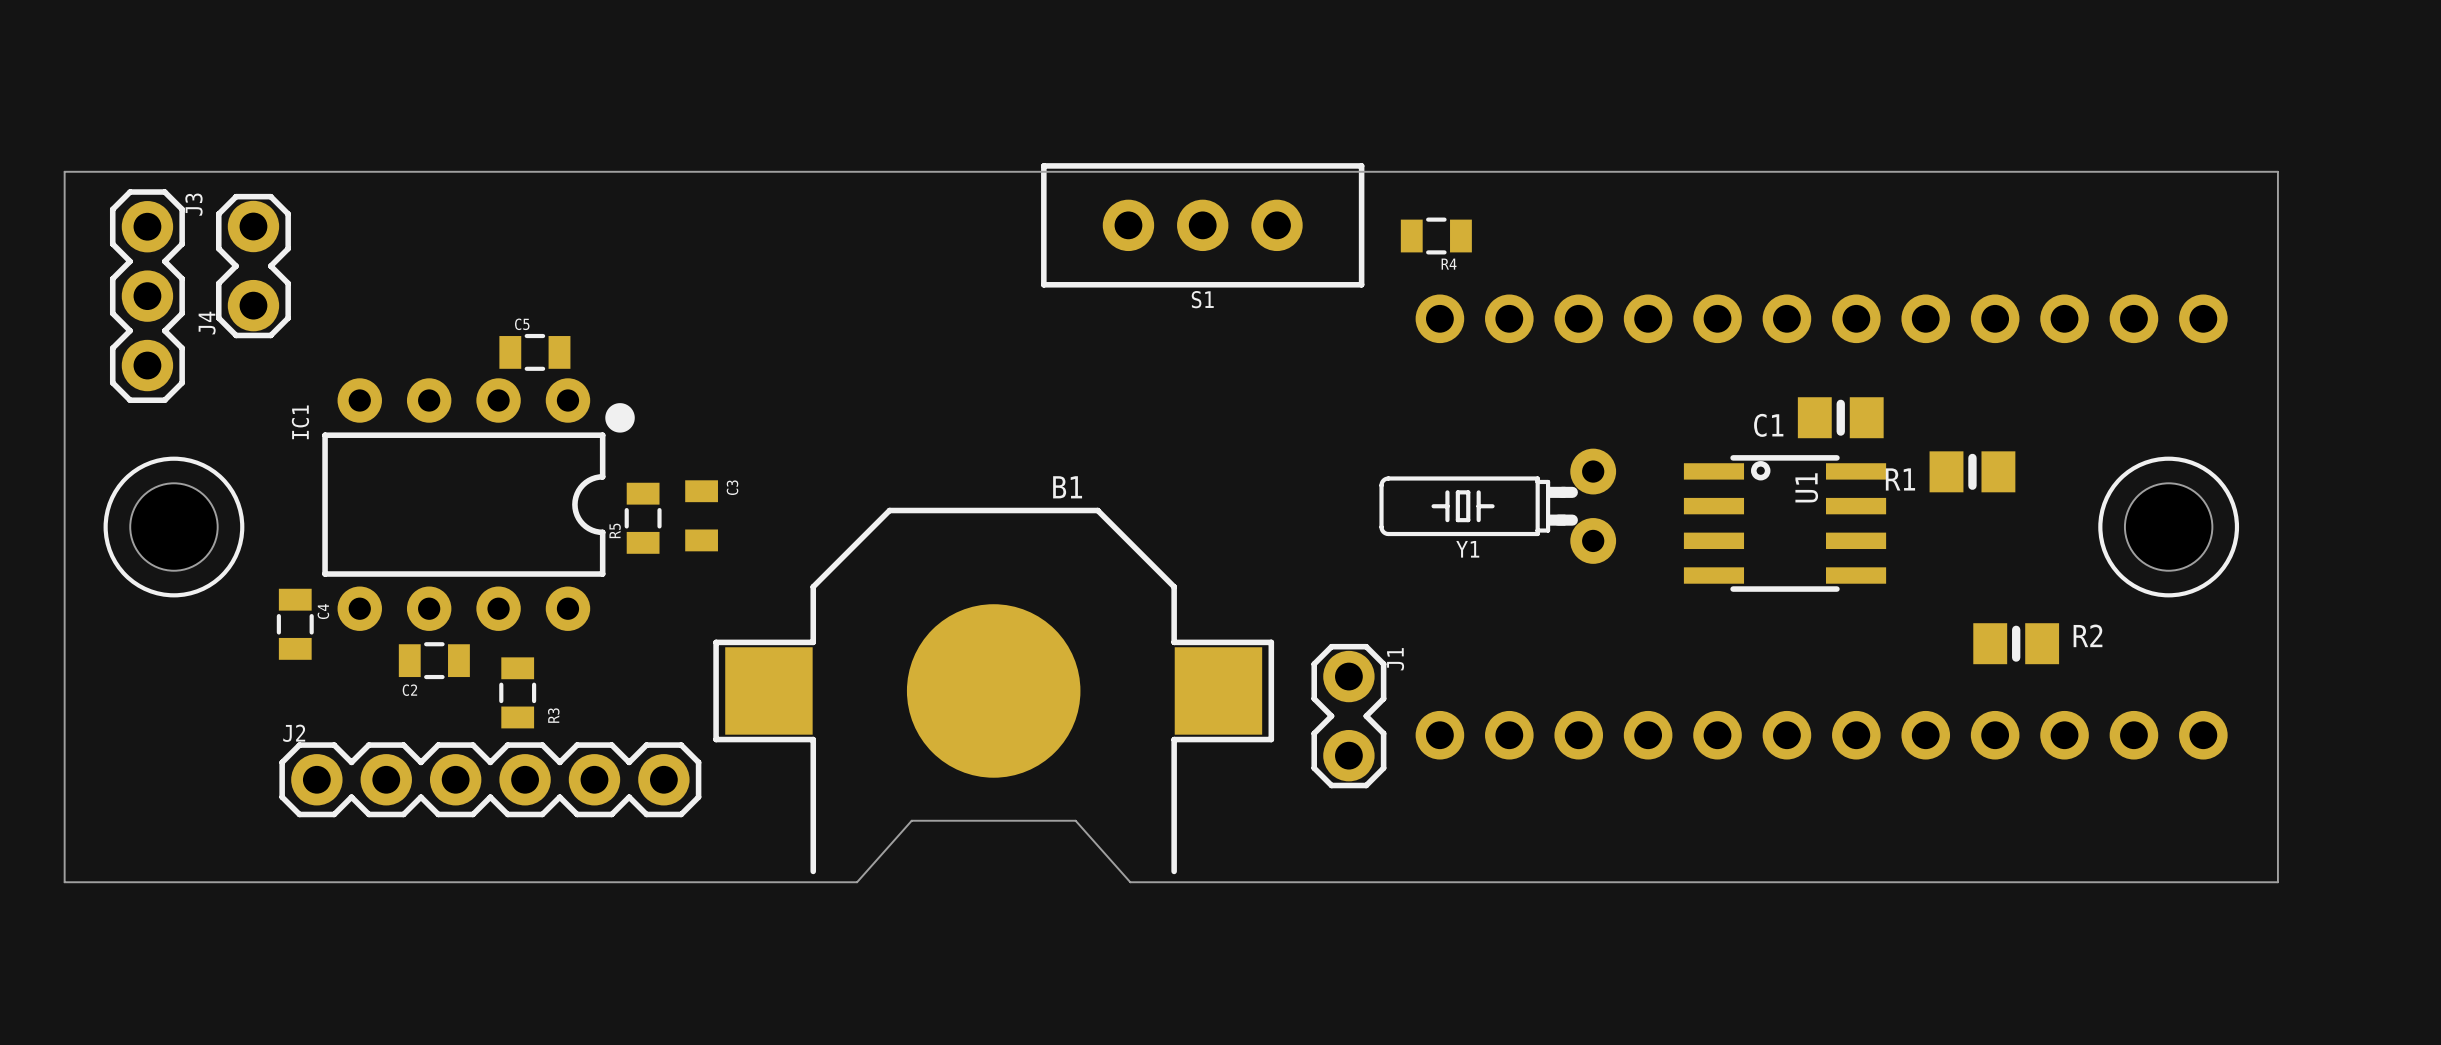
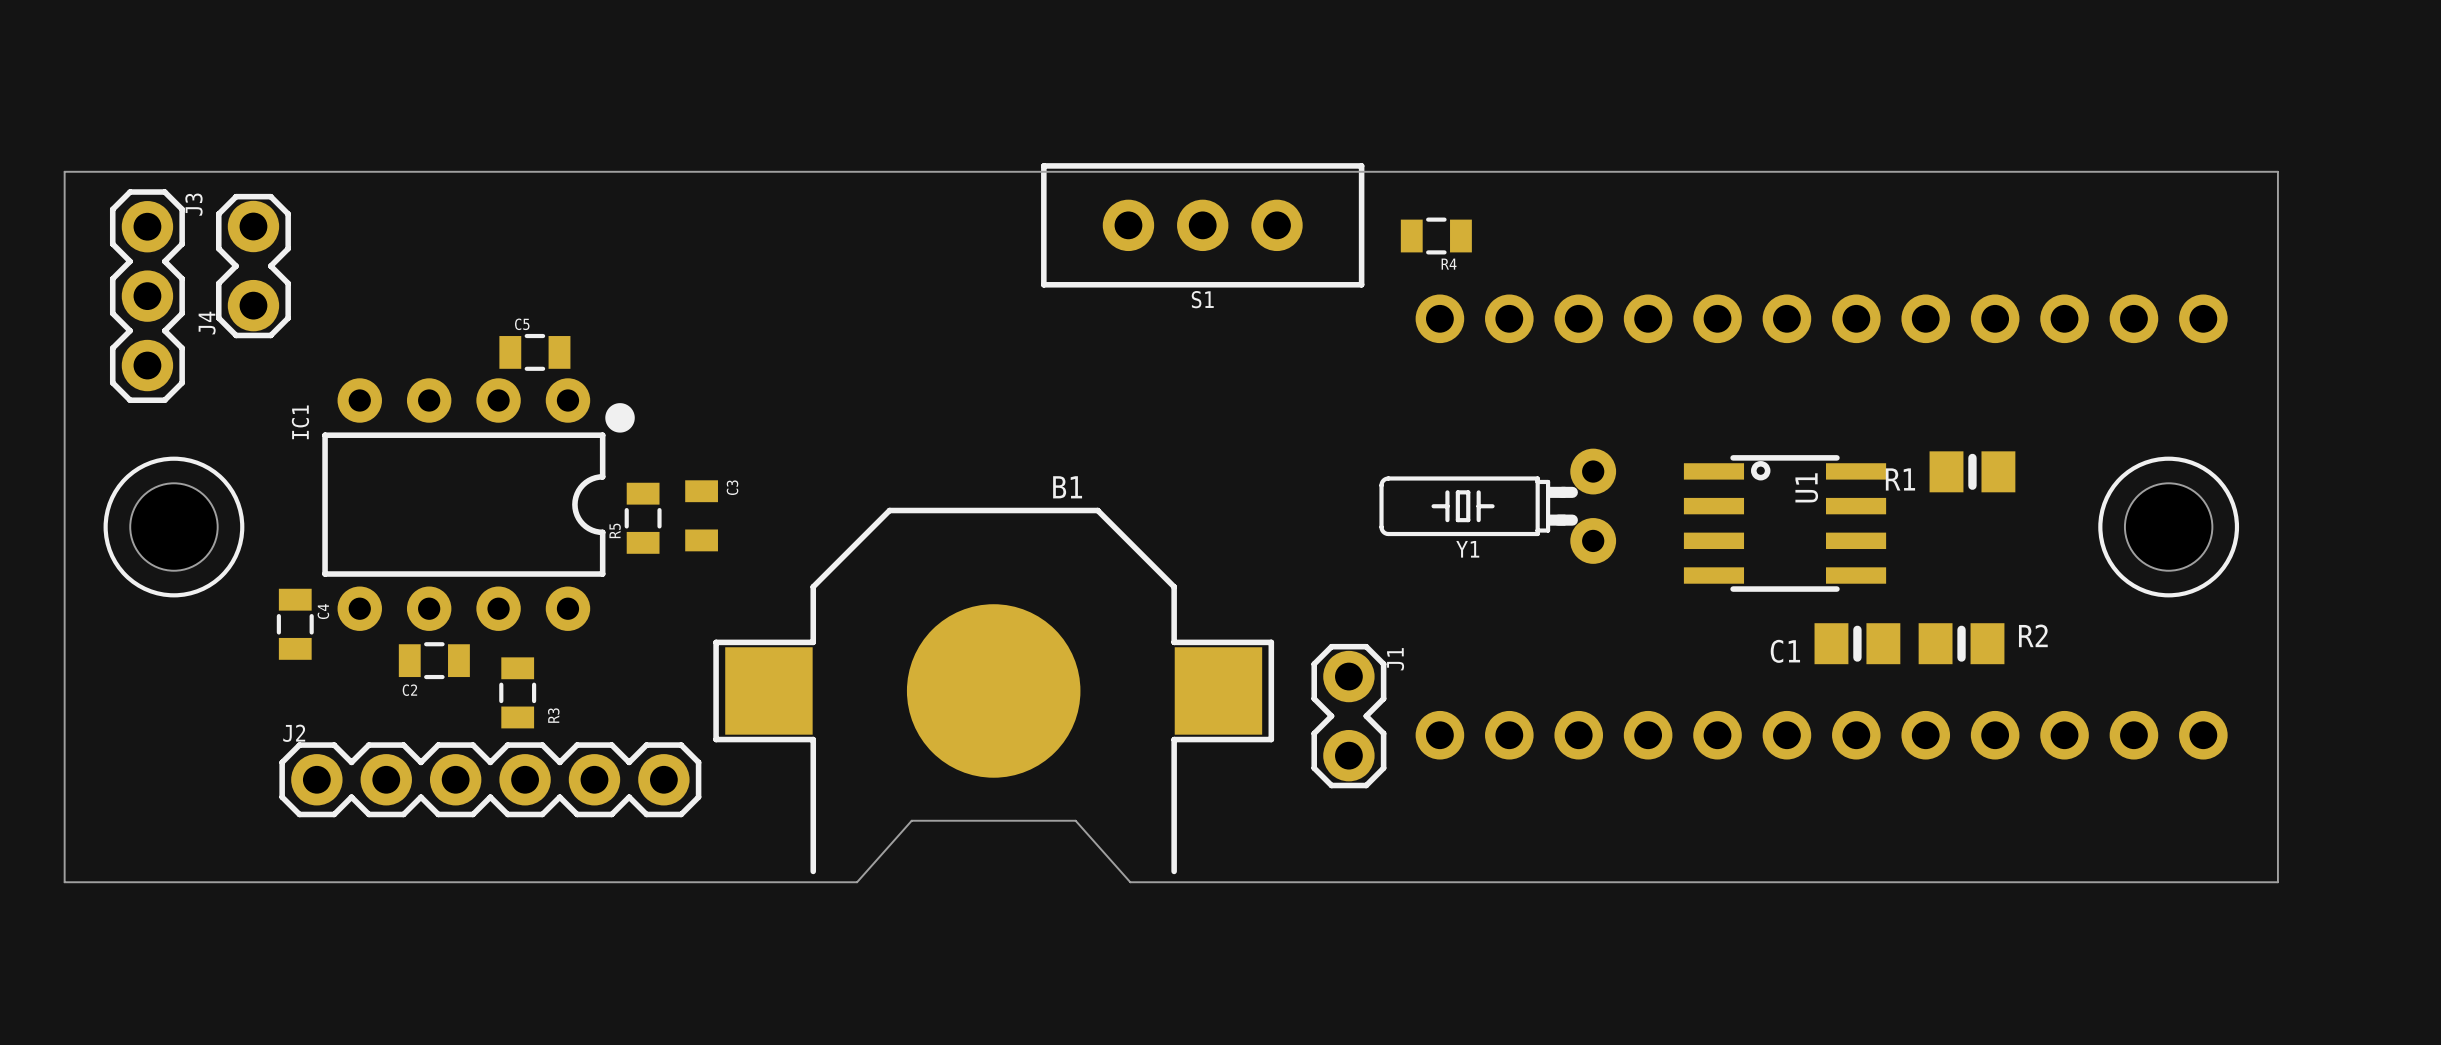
C1 position: (1840, 417) -> (1857, 643)
R2 position: (2016, 643) -> (1961, 643)

